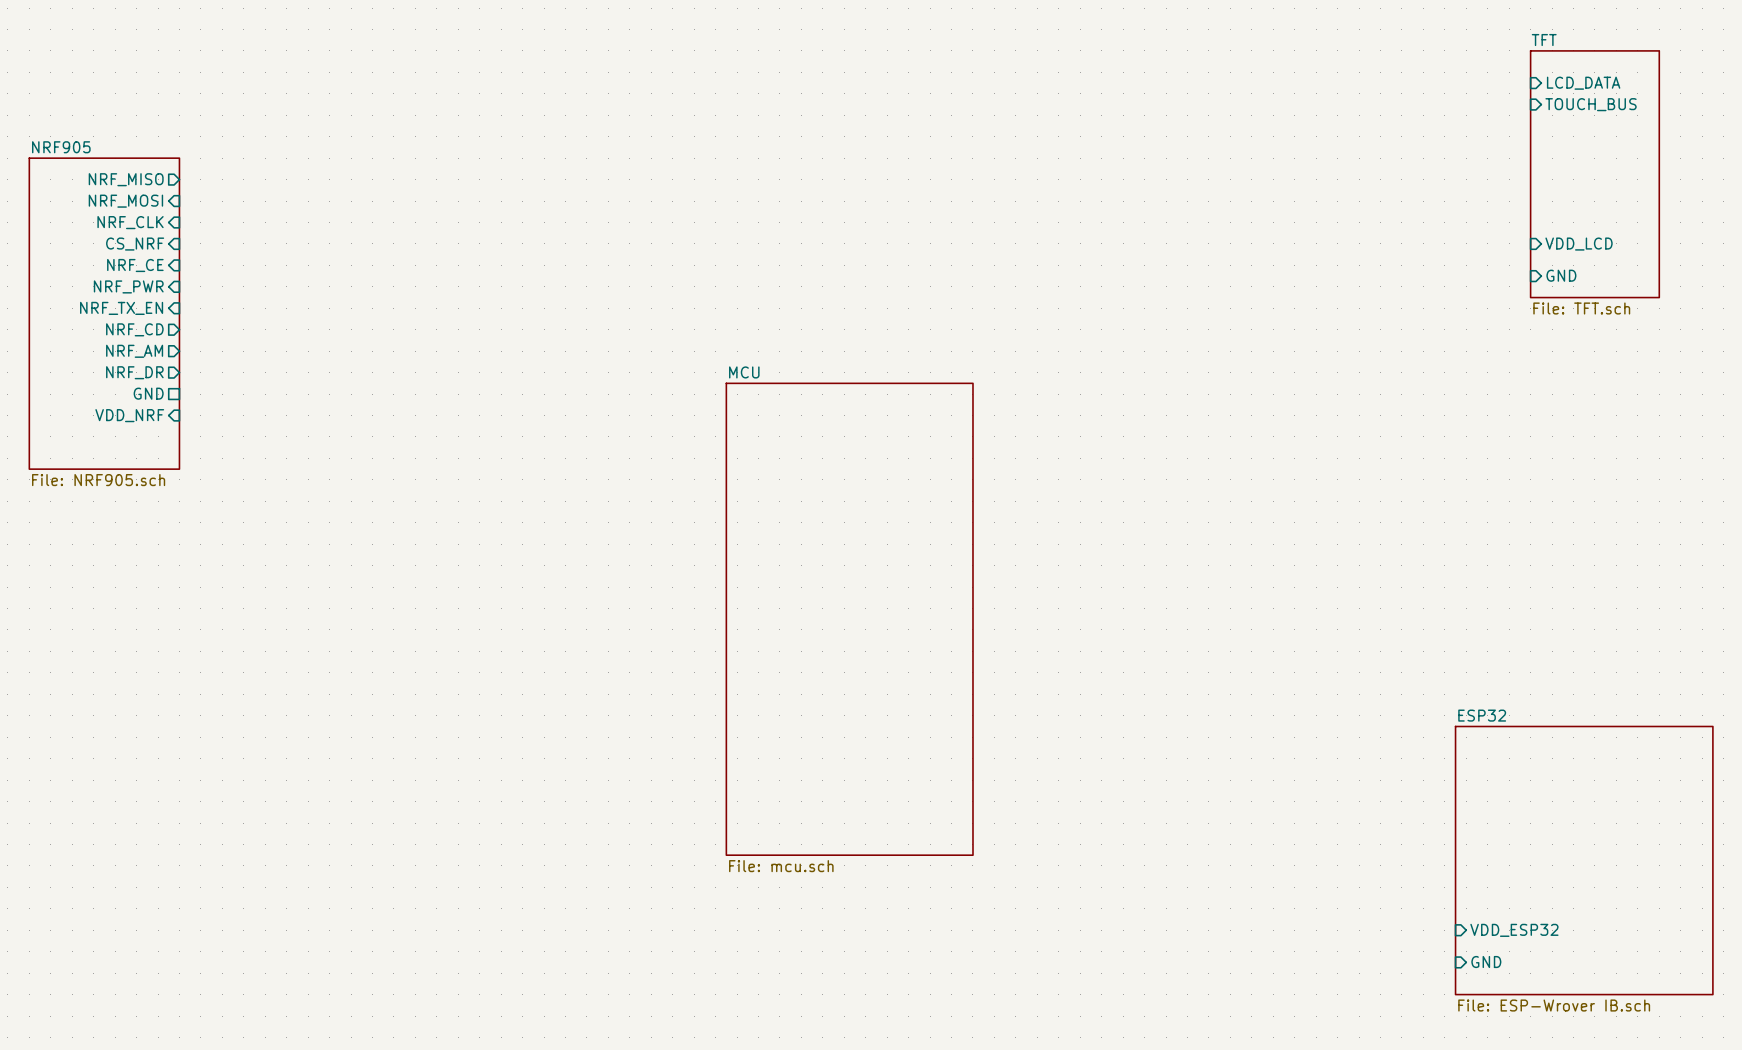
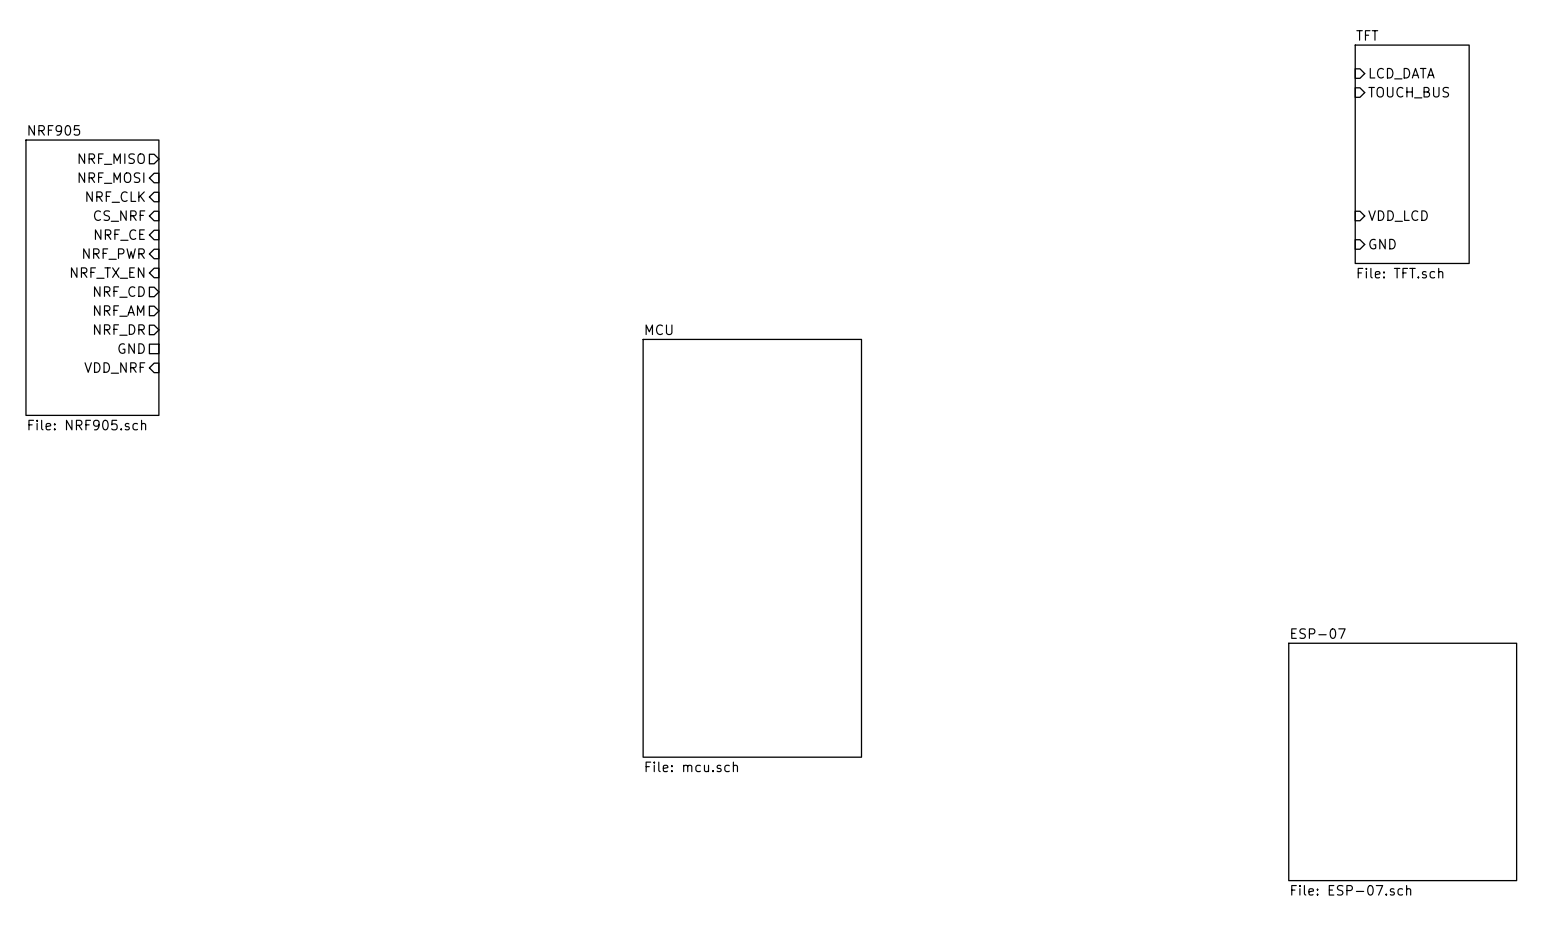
sheet ESP32 name: ESP32 (1482, 715) -> ESP-07 (1318, 633)
sheet pin: VDD_ESP32 (1514, 930) -> none
sheet pin: GND (1486, 962) -> none
sheet ESP32 value: File: ESP-Wrover IB.sch (1554, 1005) -> File: ESP-07.sch (1351, 890)

